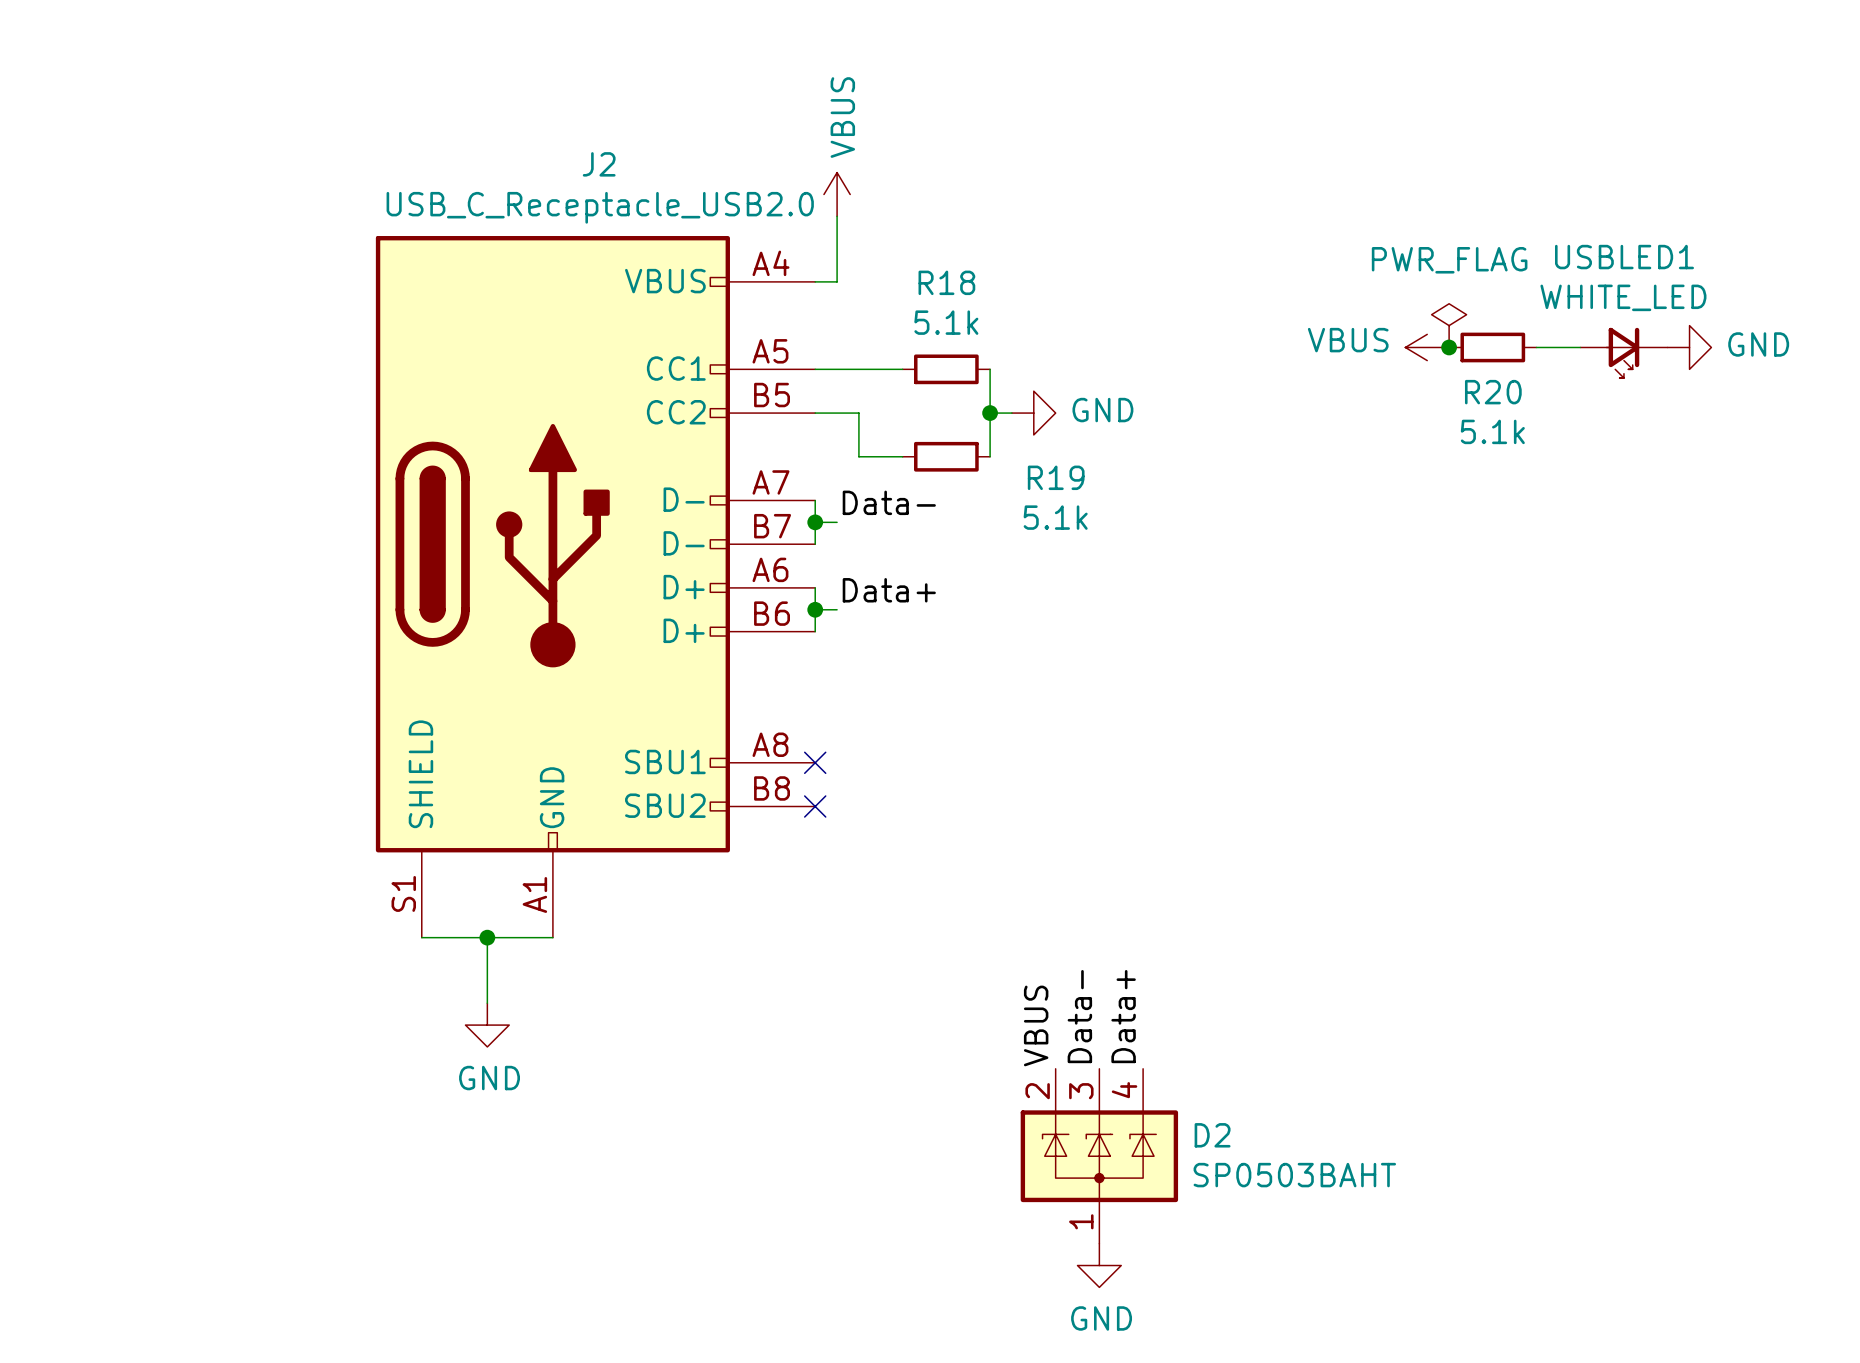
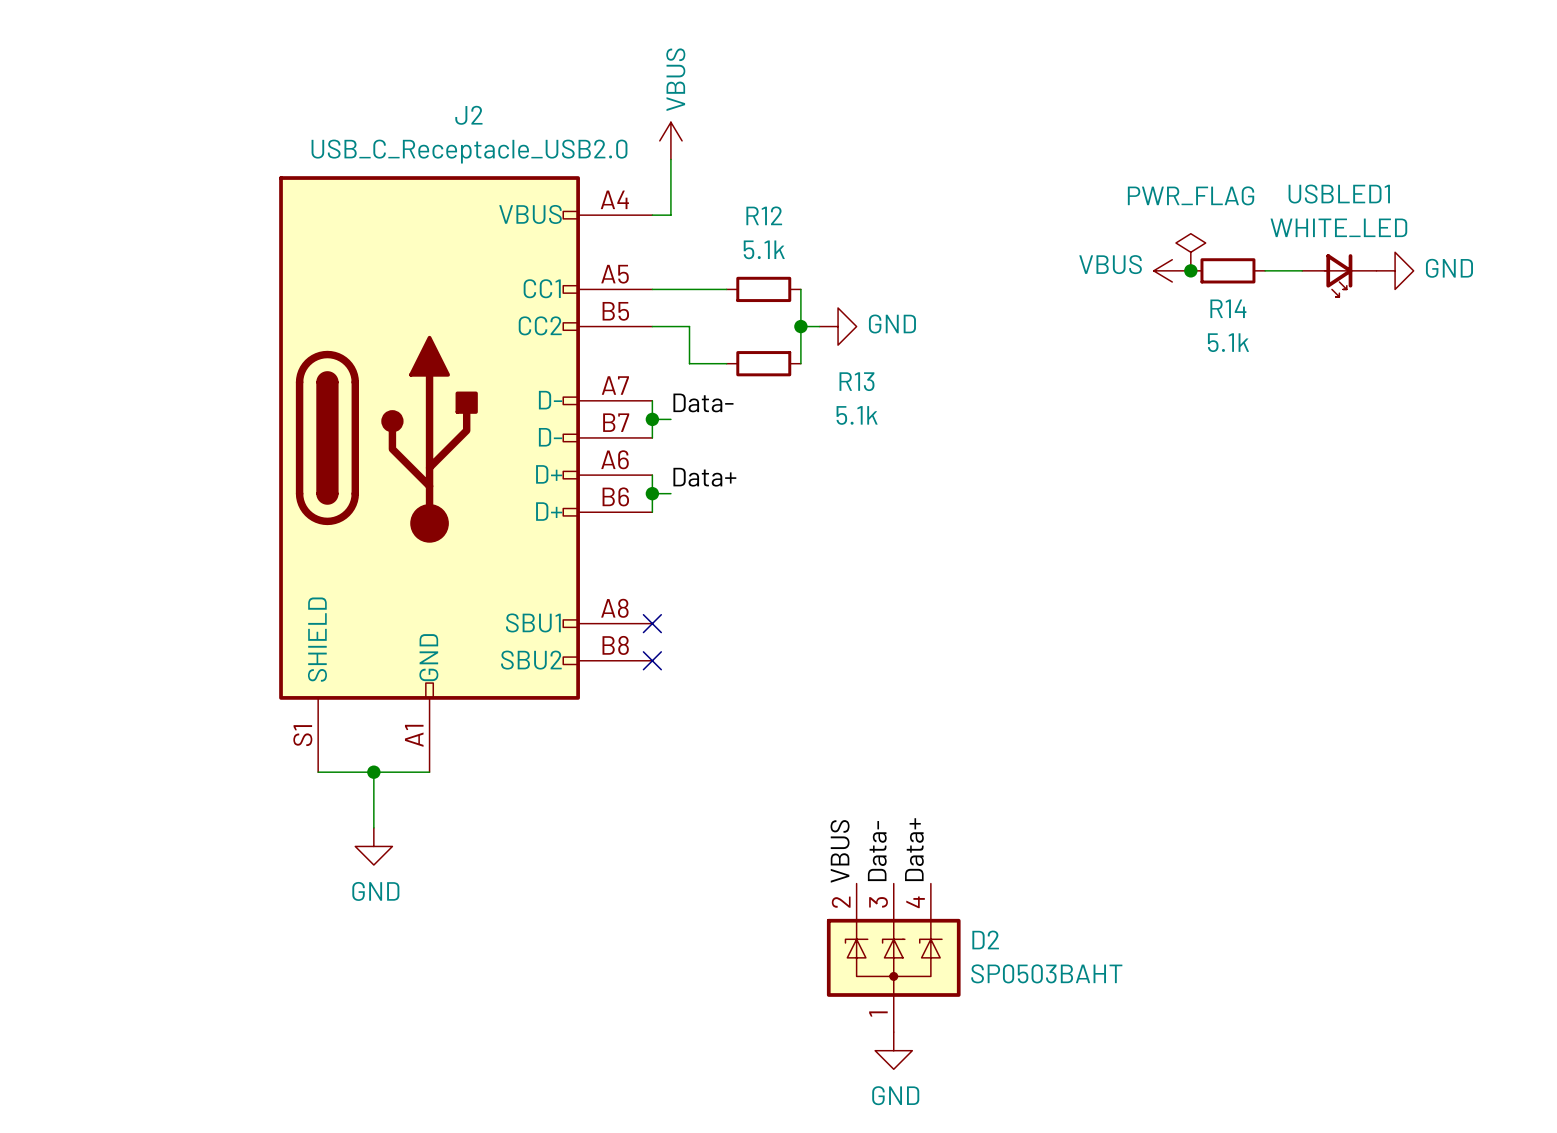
R18 name: R18 (946, 282) -> R12 (764, 215)
R20 name: R20 (1493, 392) -> R14 (1228, 308)
R19 name: R19 (1056, 477) -> R13 (856, 381)

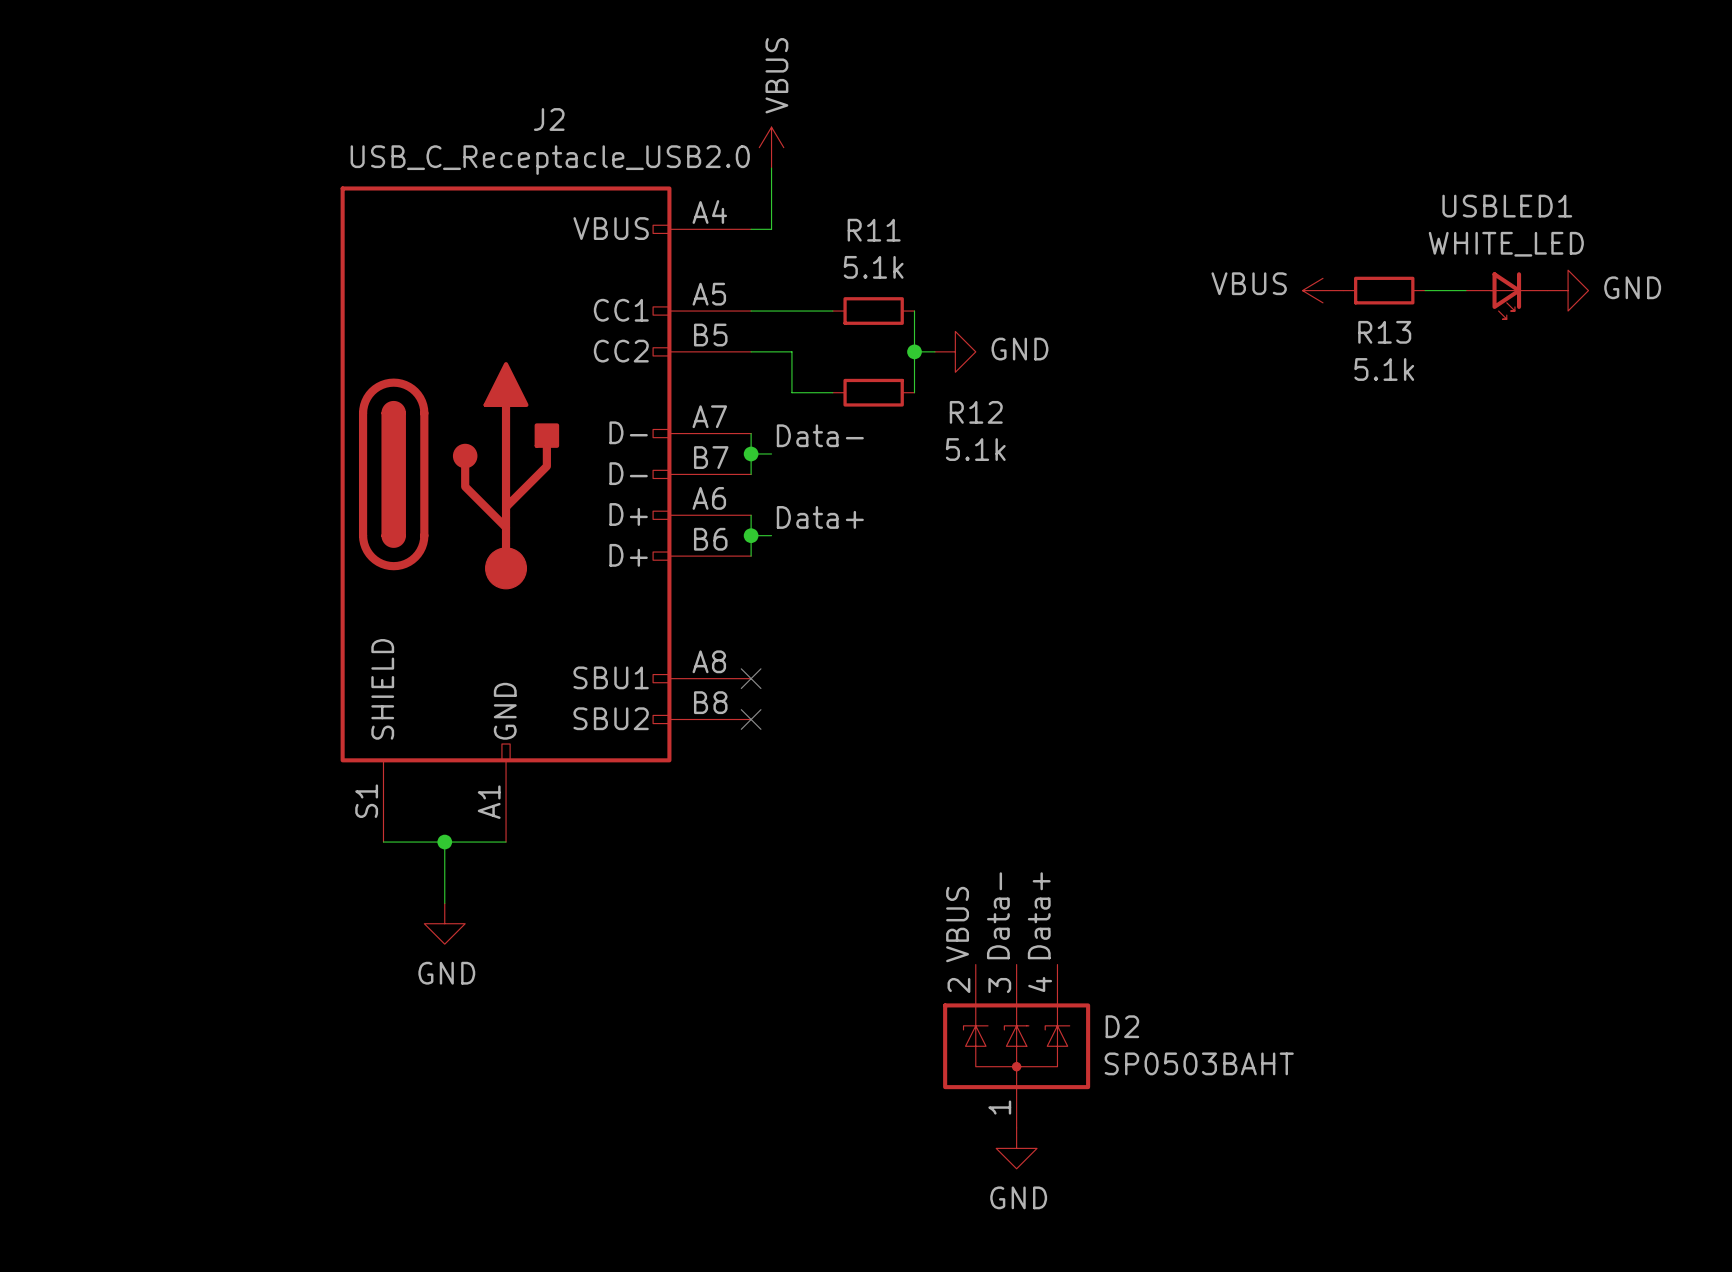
R12 name: R12 (764, 215) -> R11 (874, 230)
power symbol: PWR_FLAG (1190, 252) -> none
junction: (1190, 270) -> none
R14 name: R14 (1228, 308) -> R13 (1384, 332)
R13 name: R13 (856, 381) -> R12 (976, 412)

